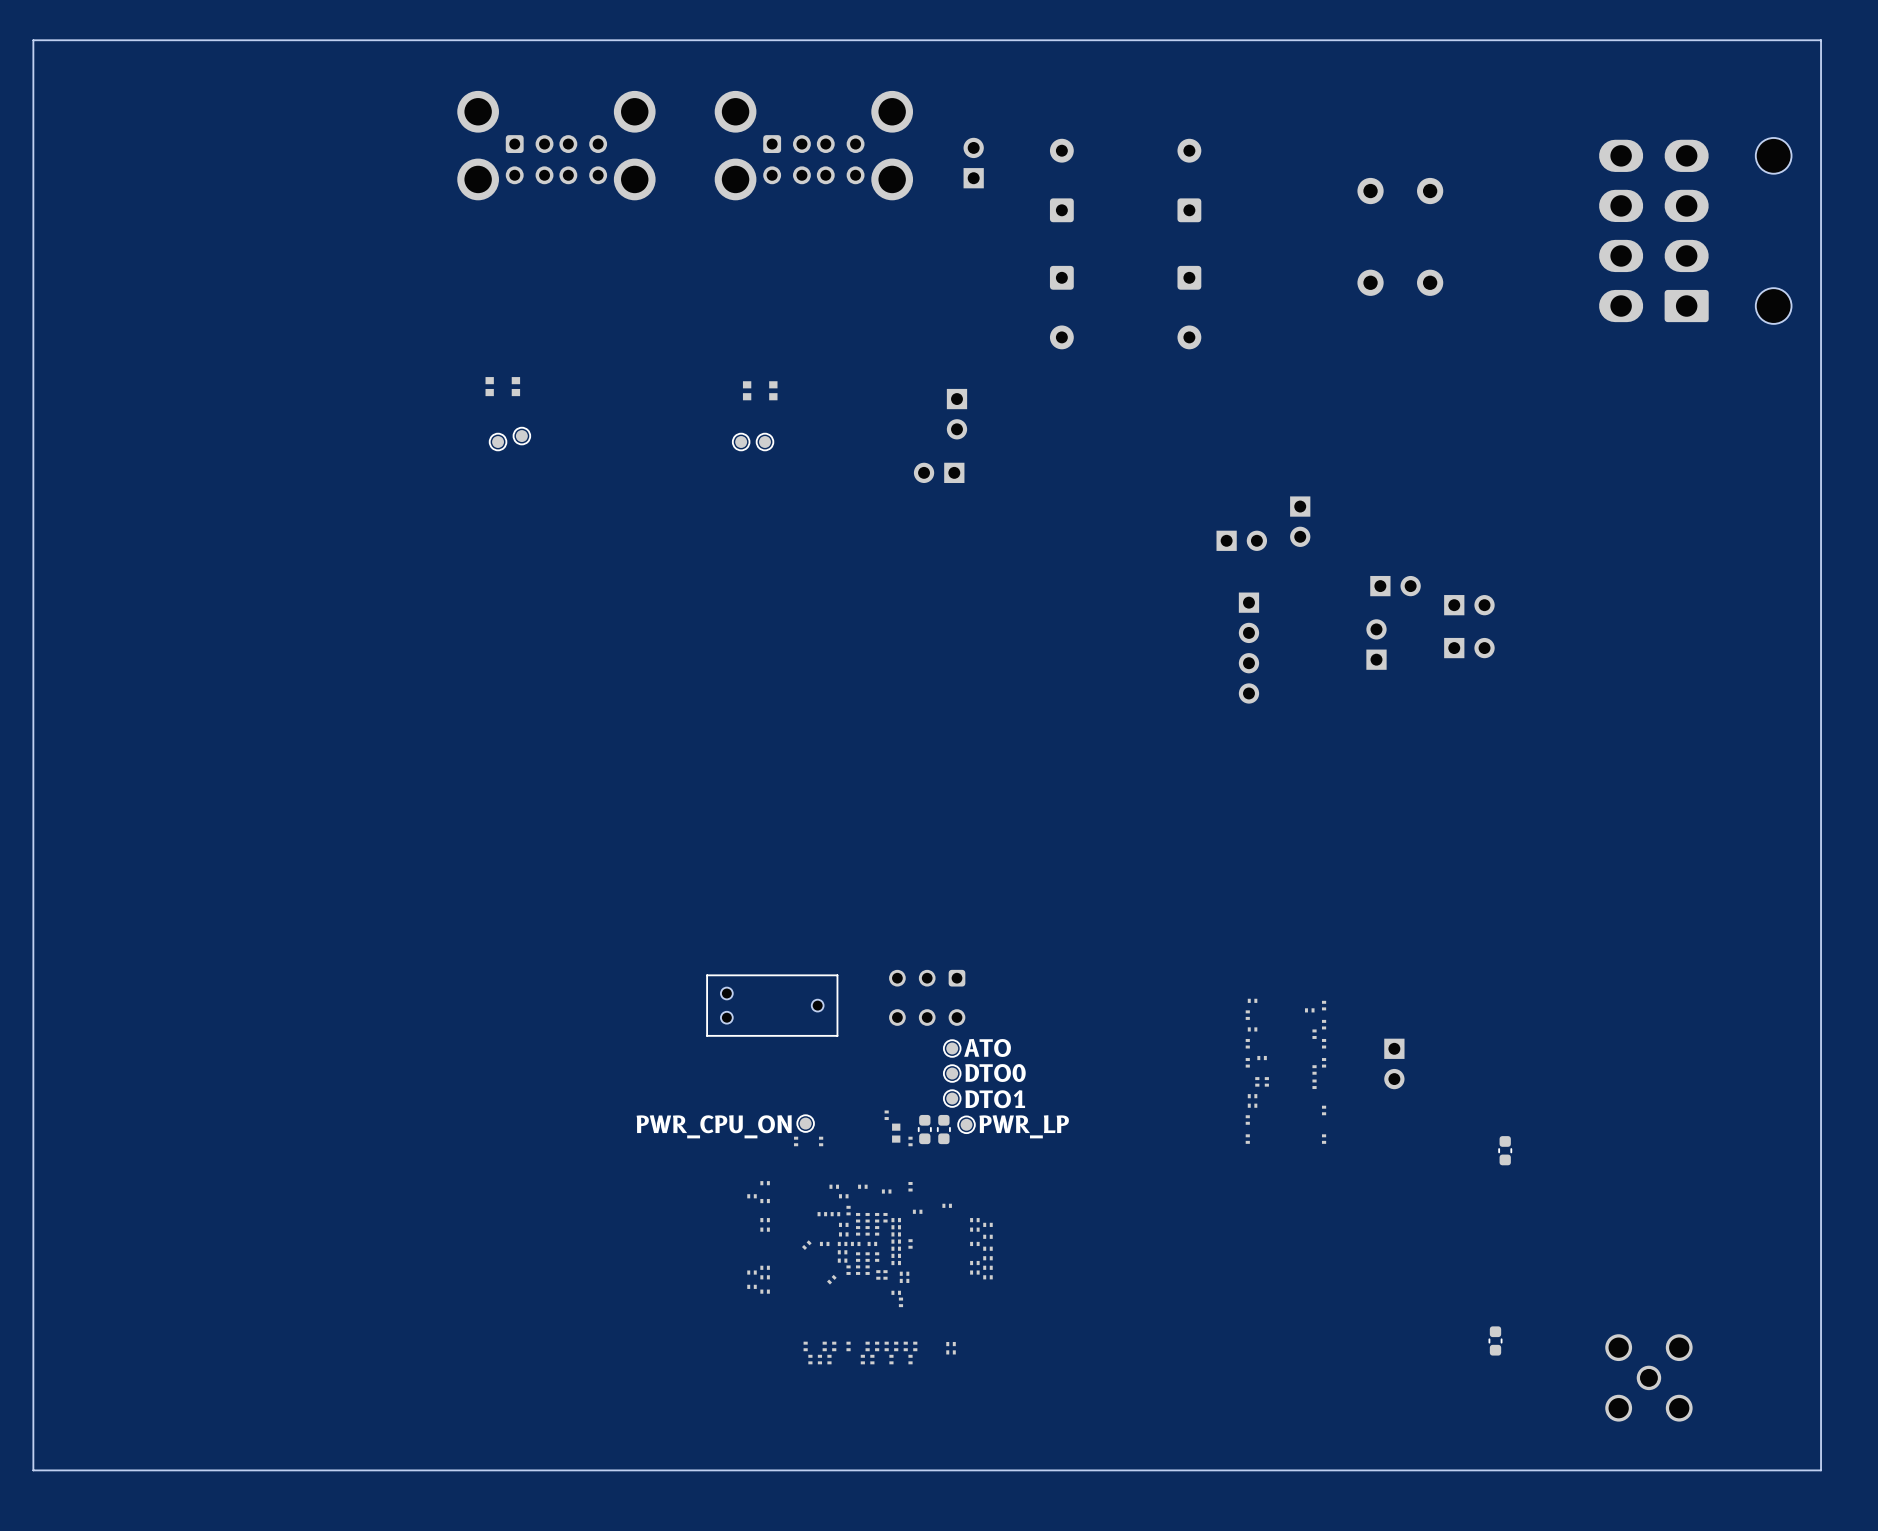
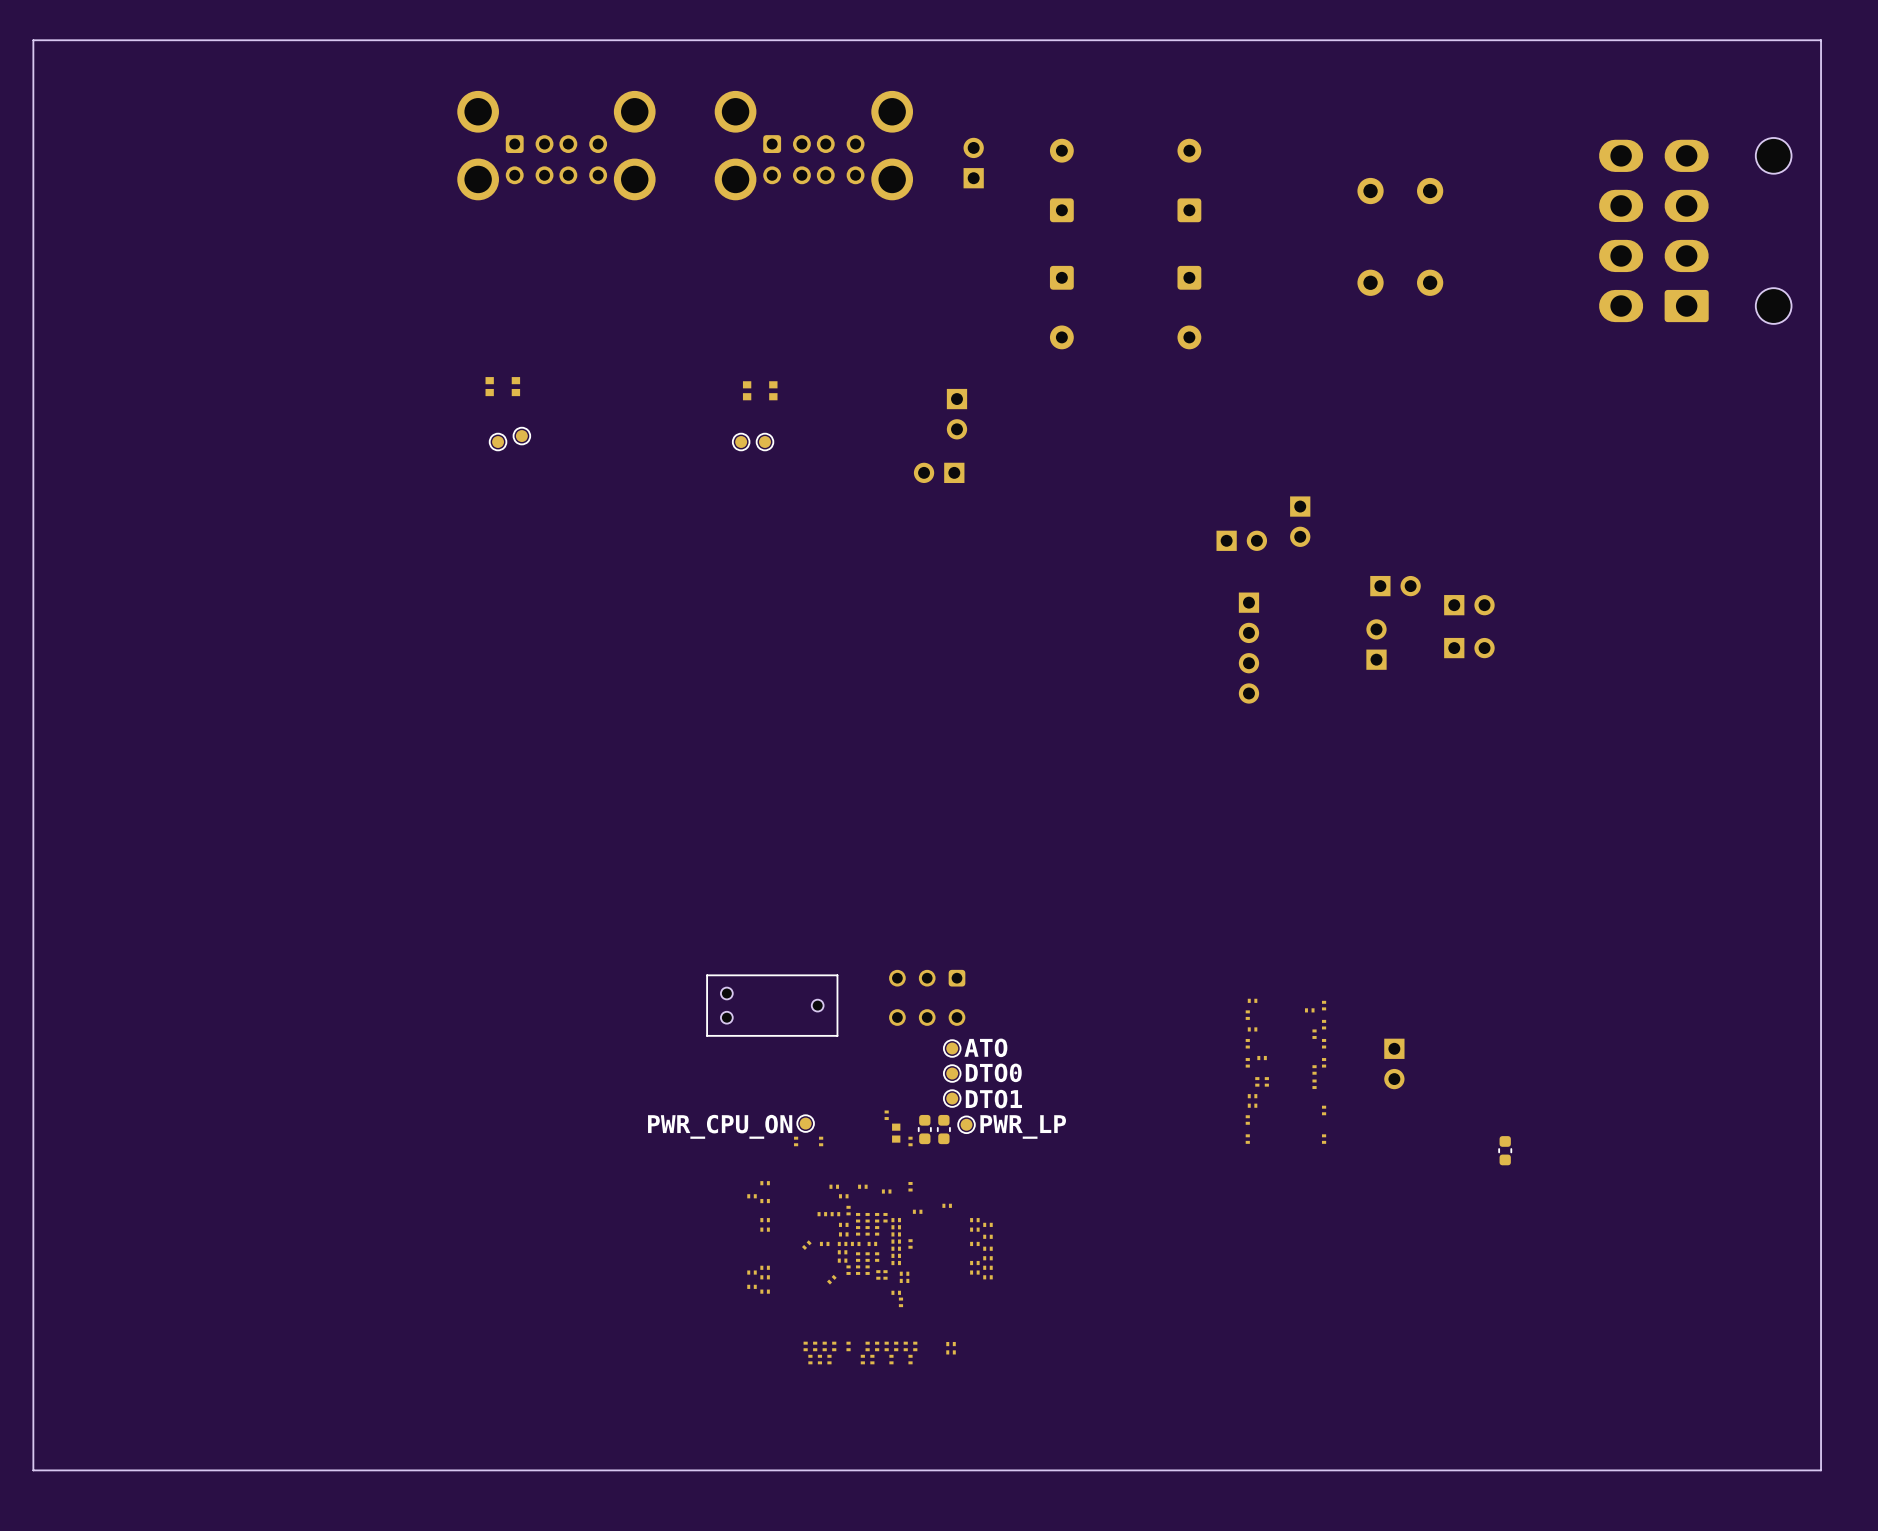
part: (1495, 1340) -> none
part: none -> (815, 1346)
part: (1648, 1377) -> none

